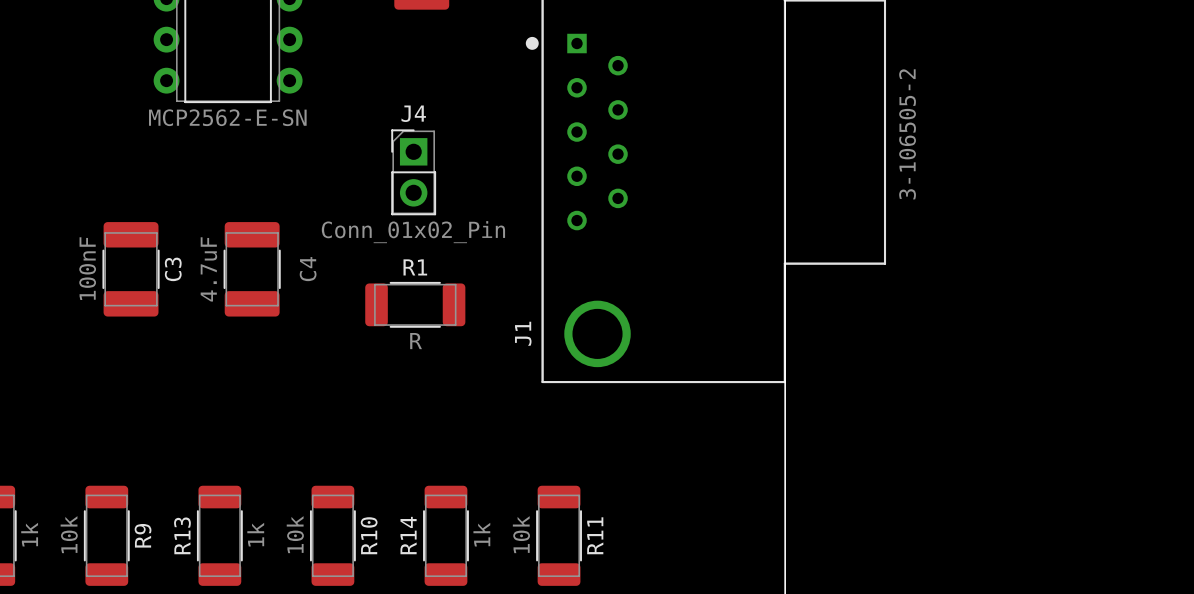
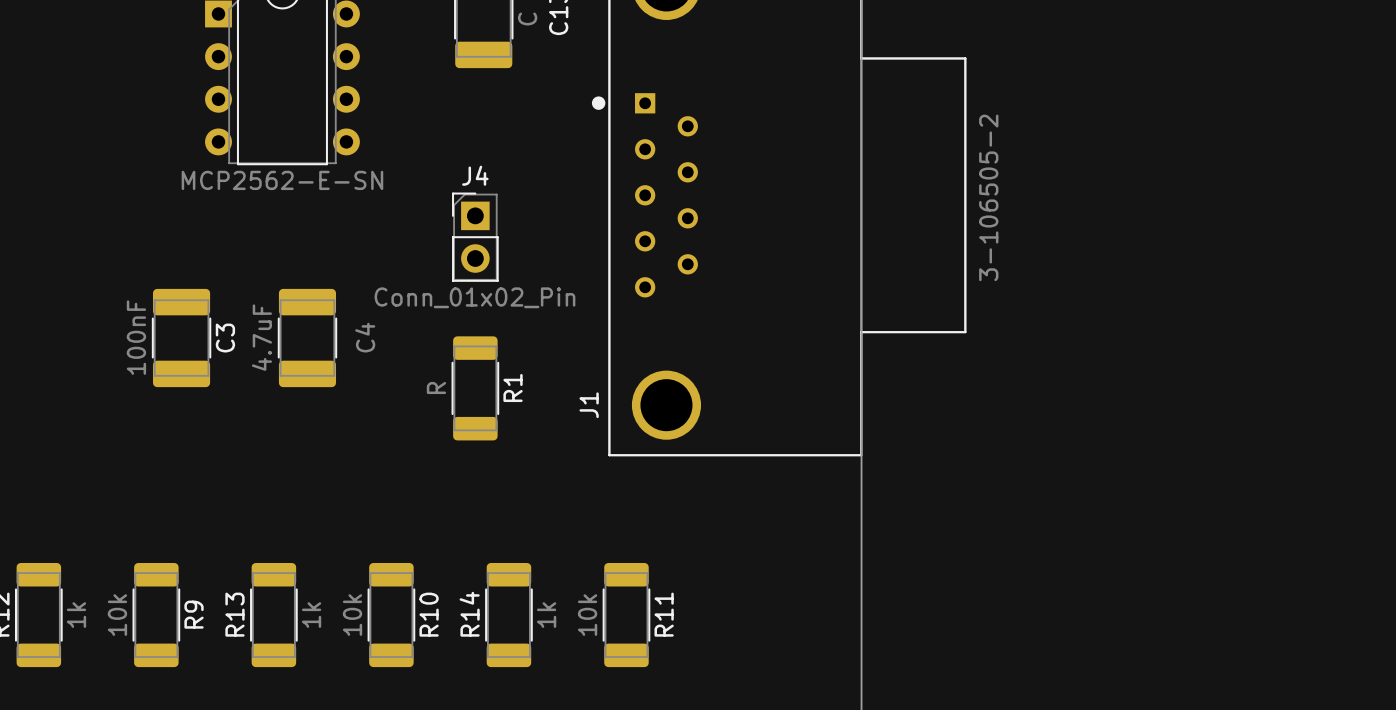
R1 rotation: 0° (415, 304) -> 90° clockwise (475, 388)

